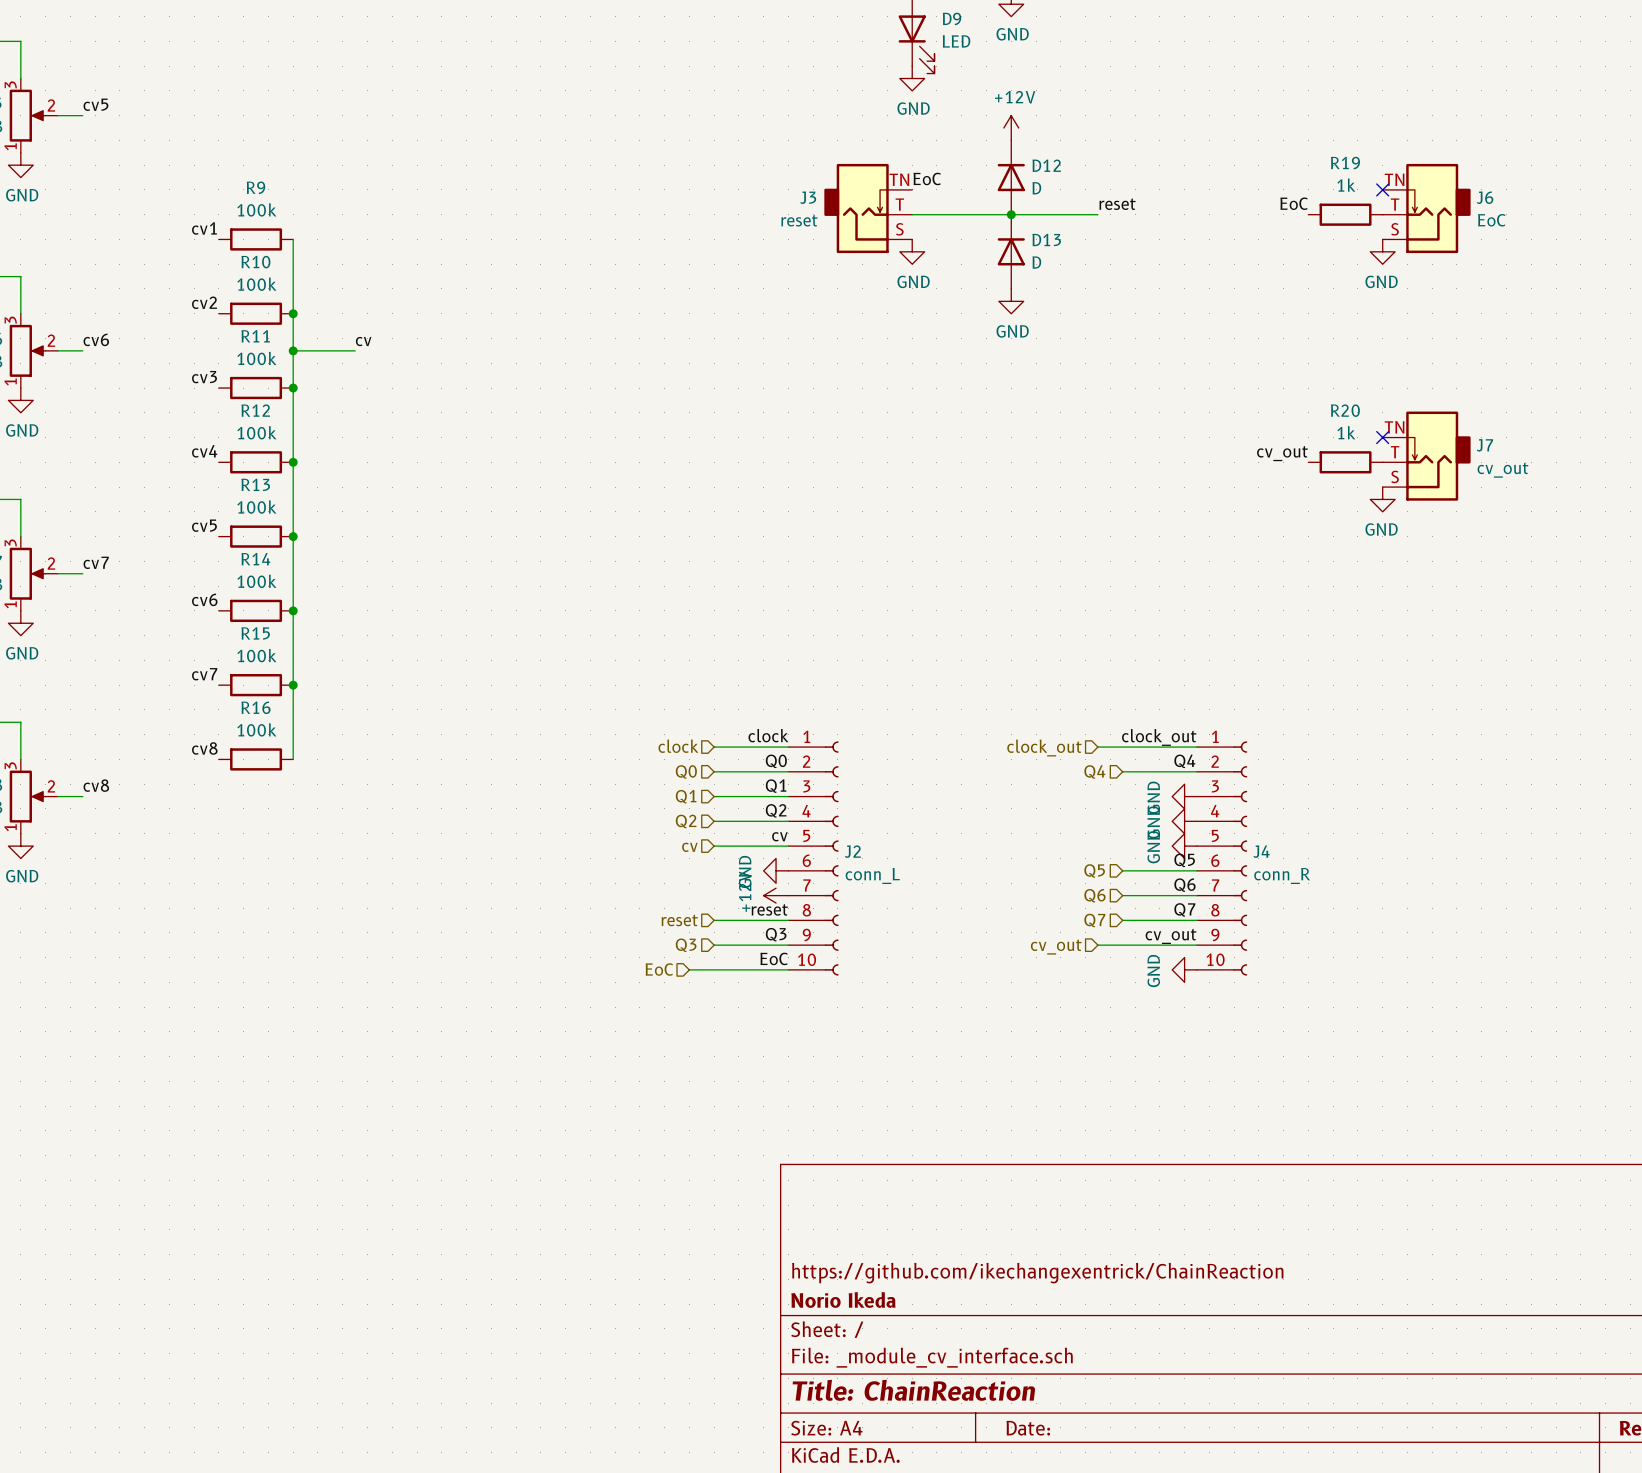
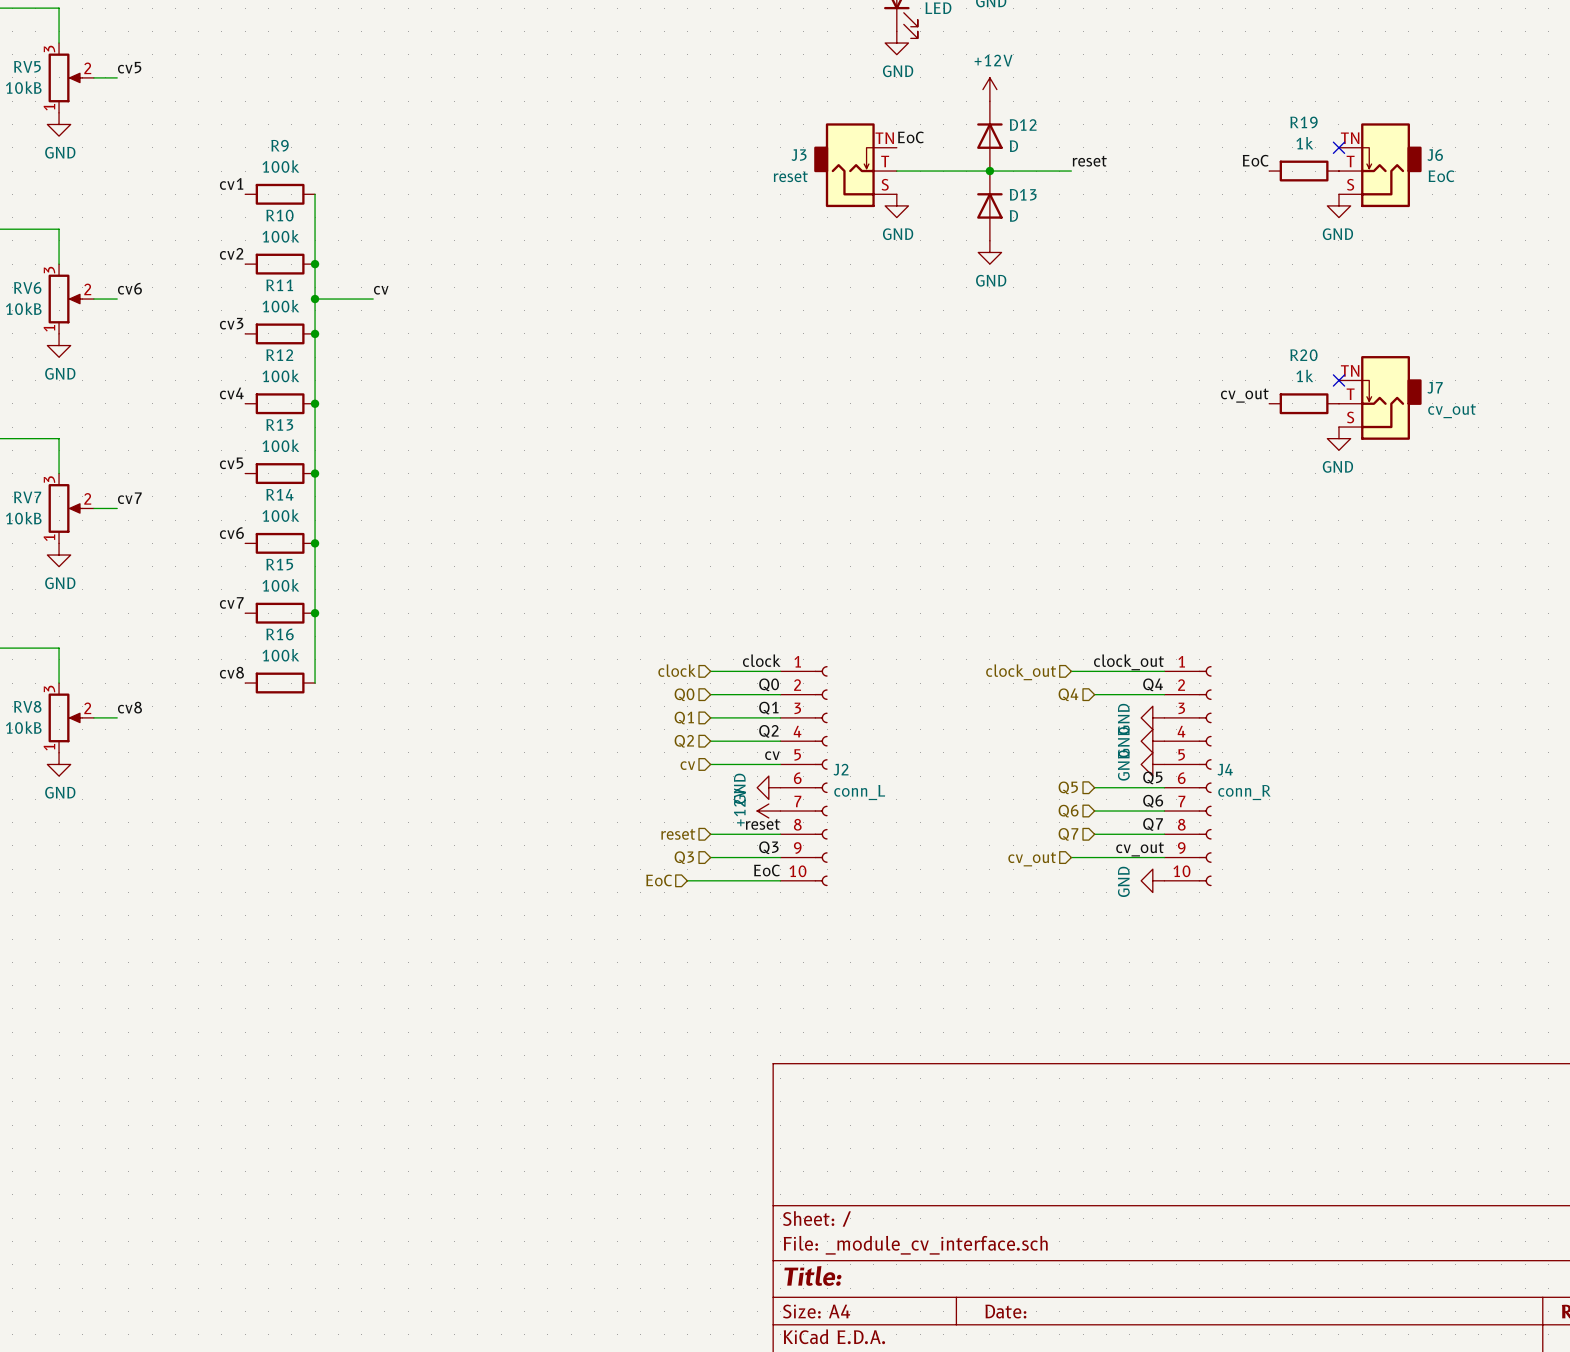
title block: https://github.com/ikechangexentrick/ChainReaction (1037, 1273) -> none
title block: Norio Ikeda (843, 1299) -> none
title block: Title: ChainReaction (913, 1390) -> Title: (812, 1275)

